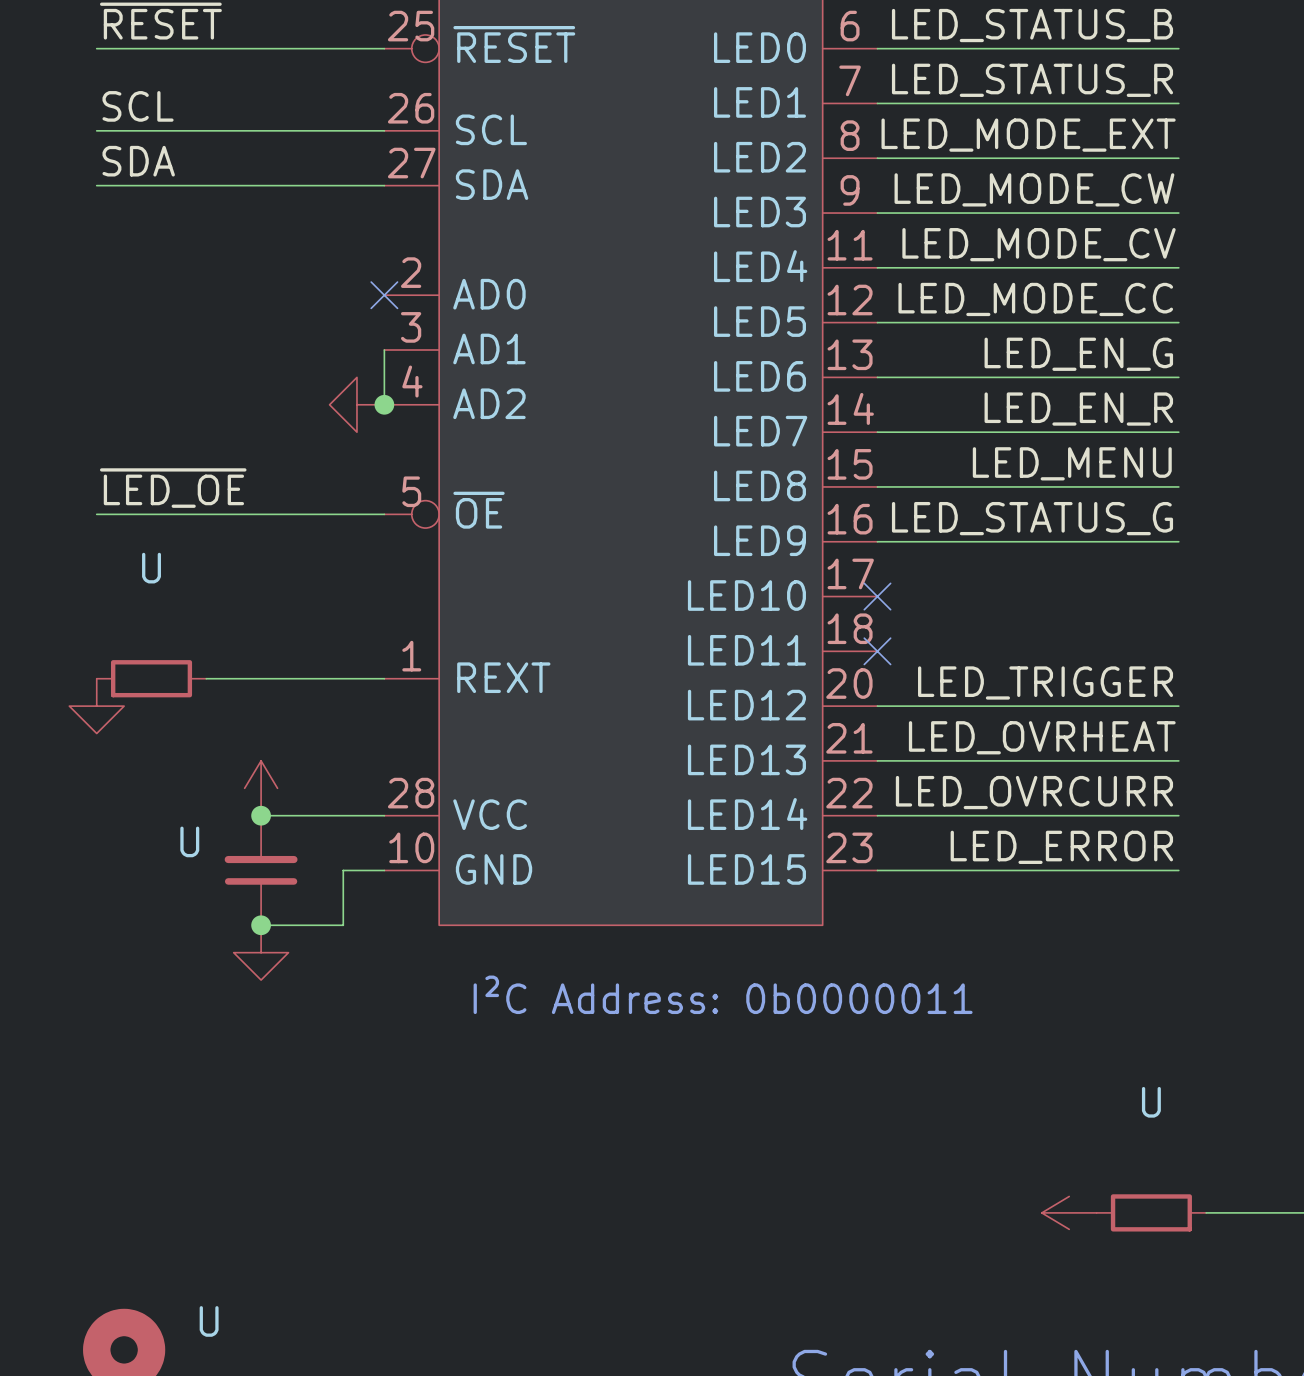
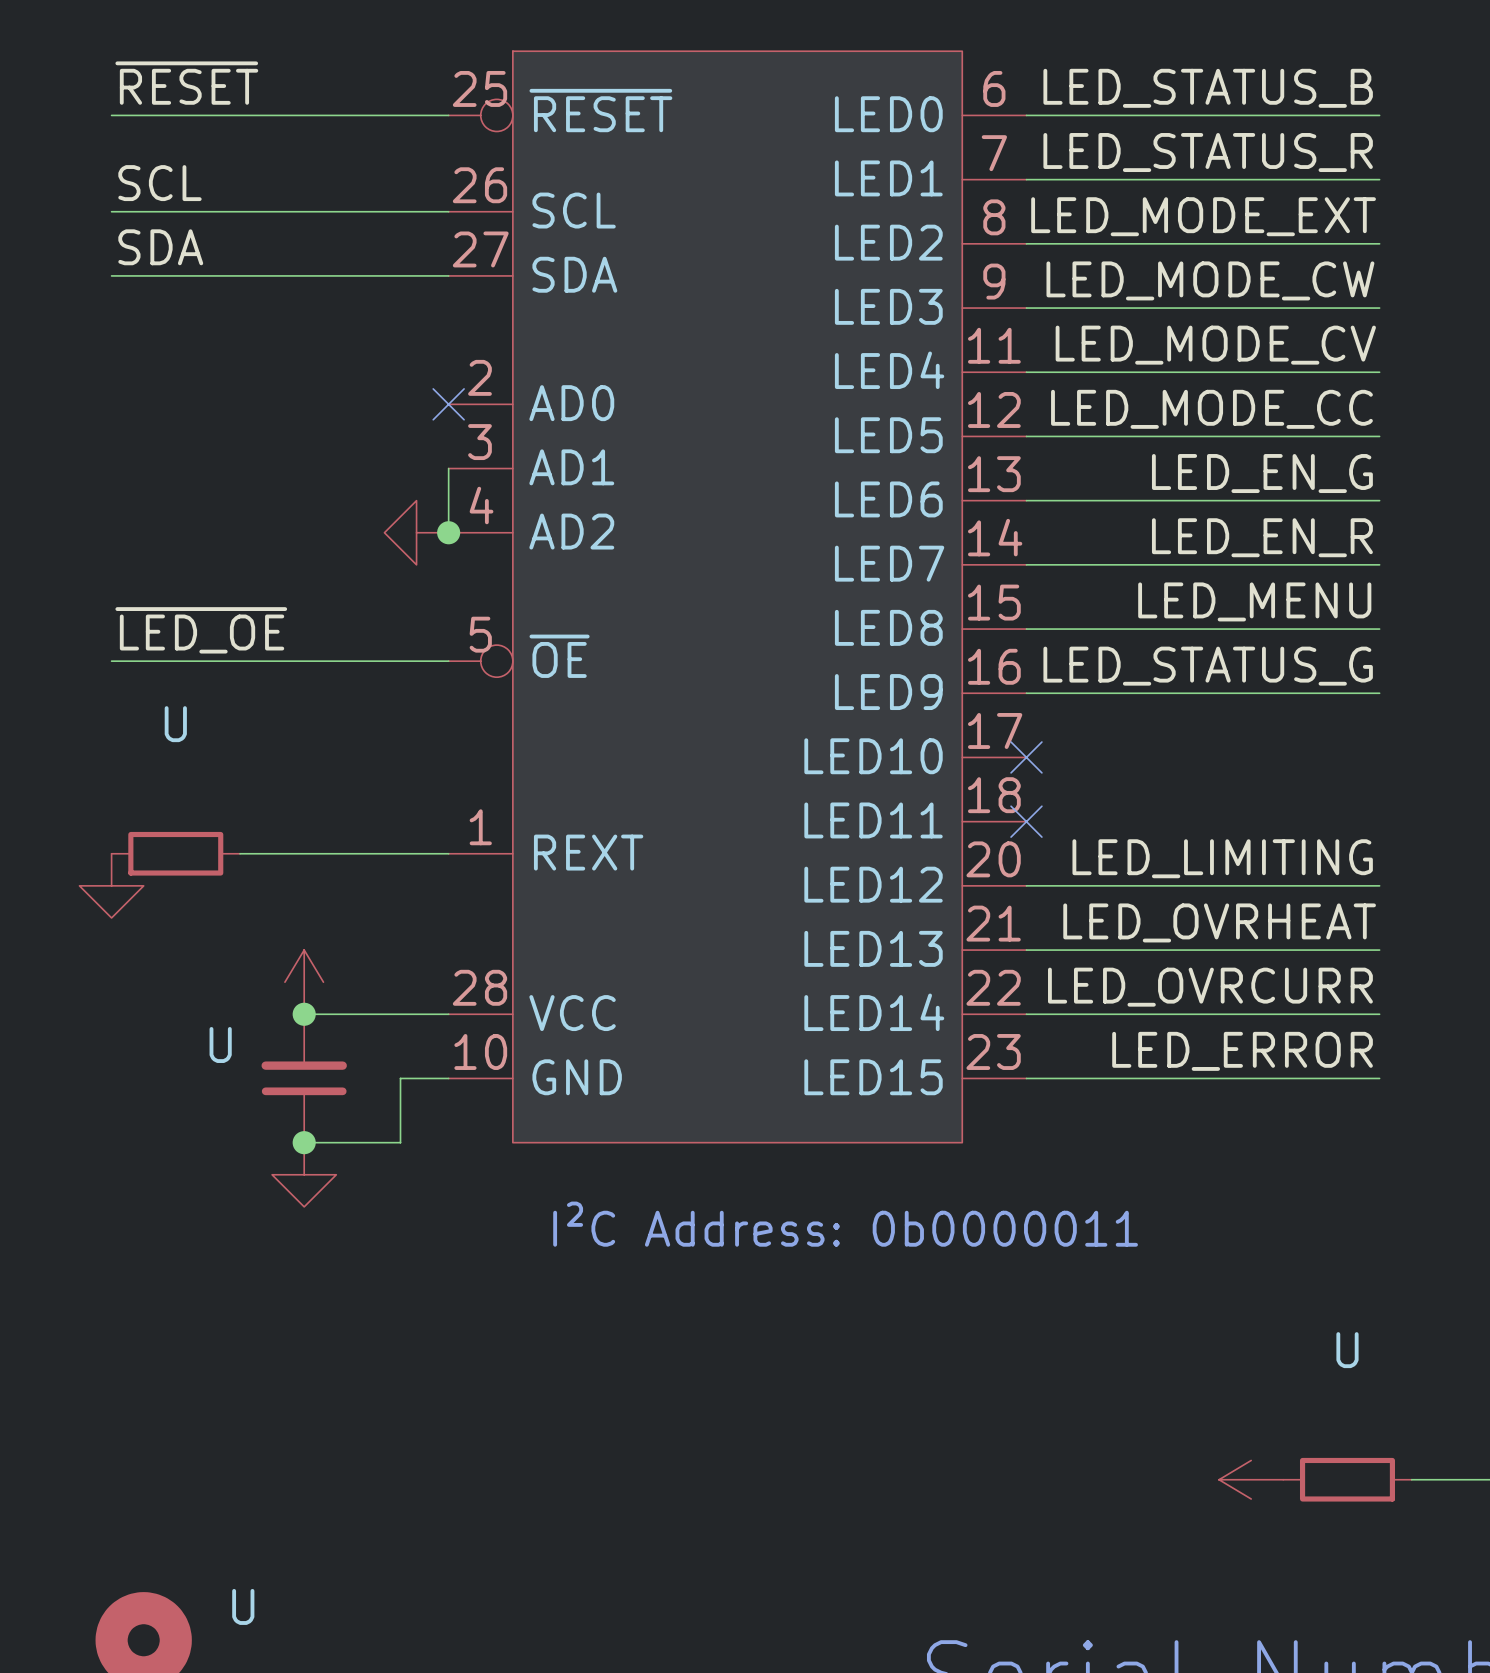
label: LED_TRIGGER (1045, 682) -> LED_LIMITING (1222, 858)

